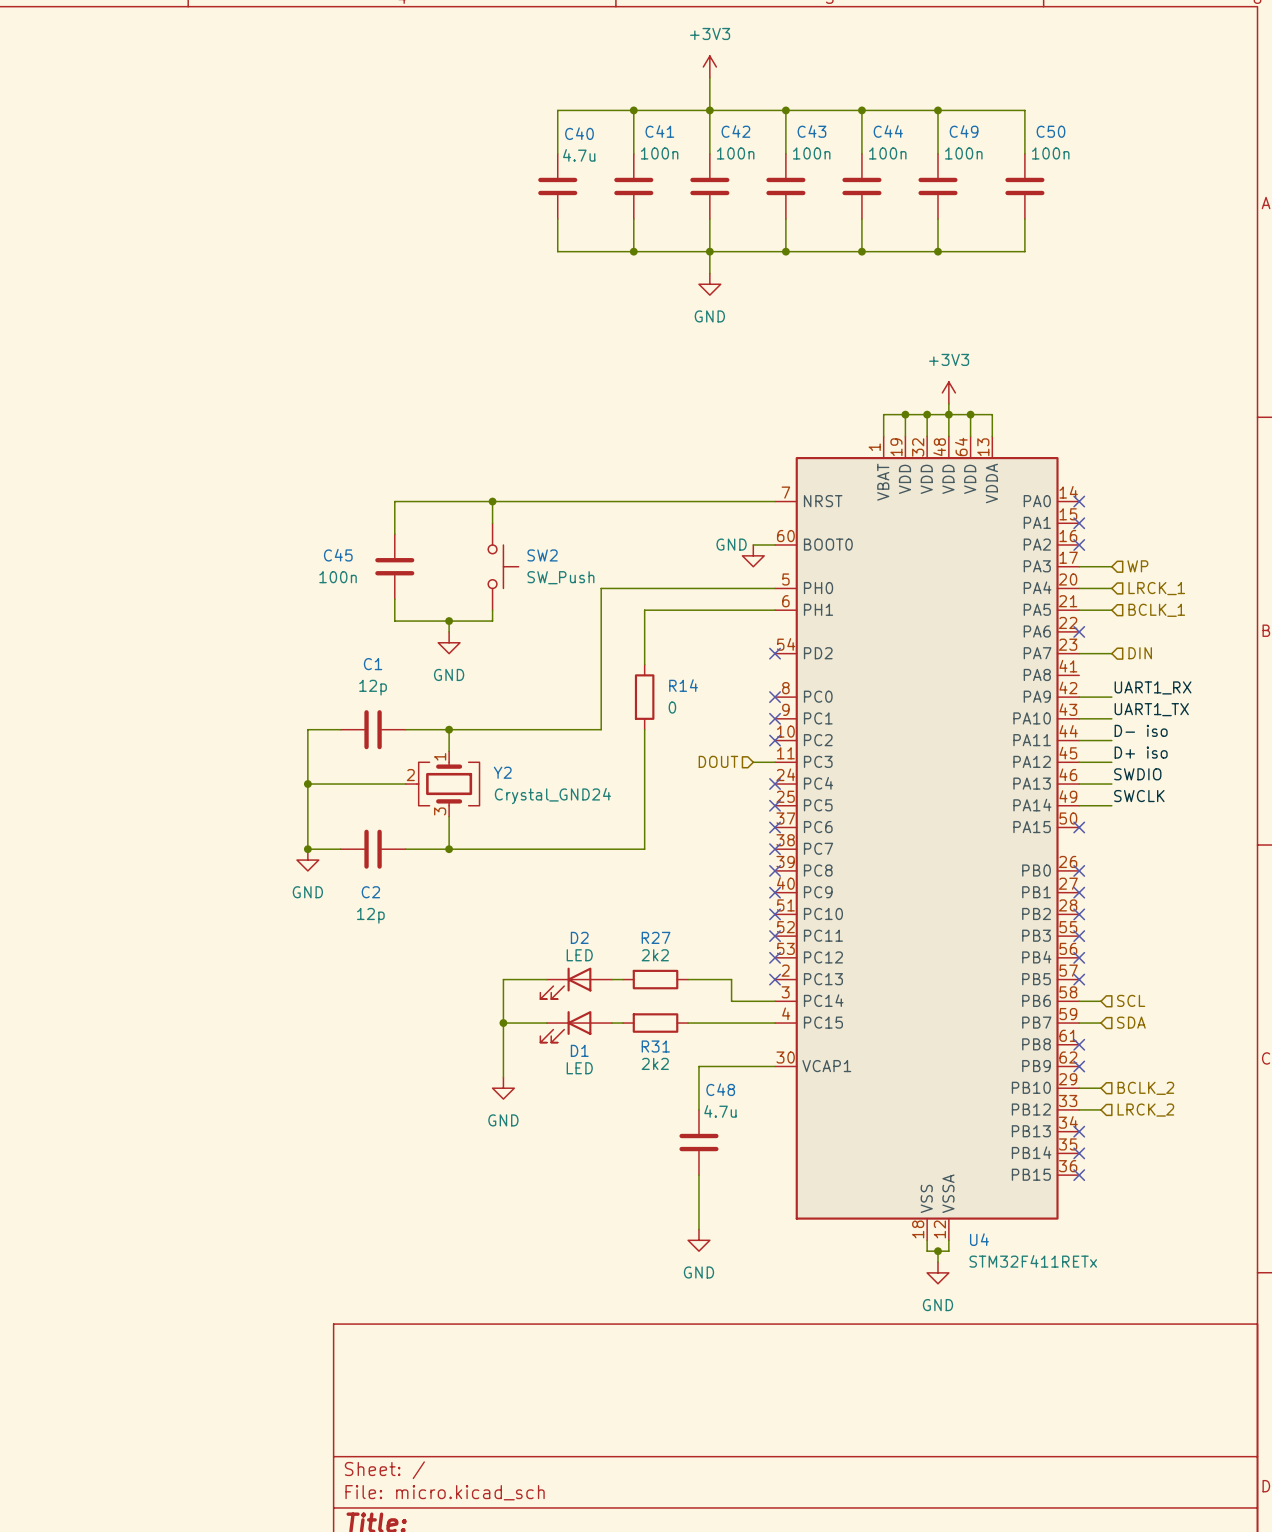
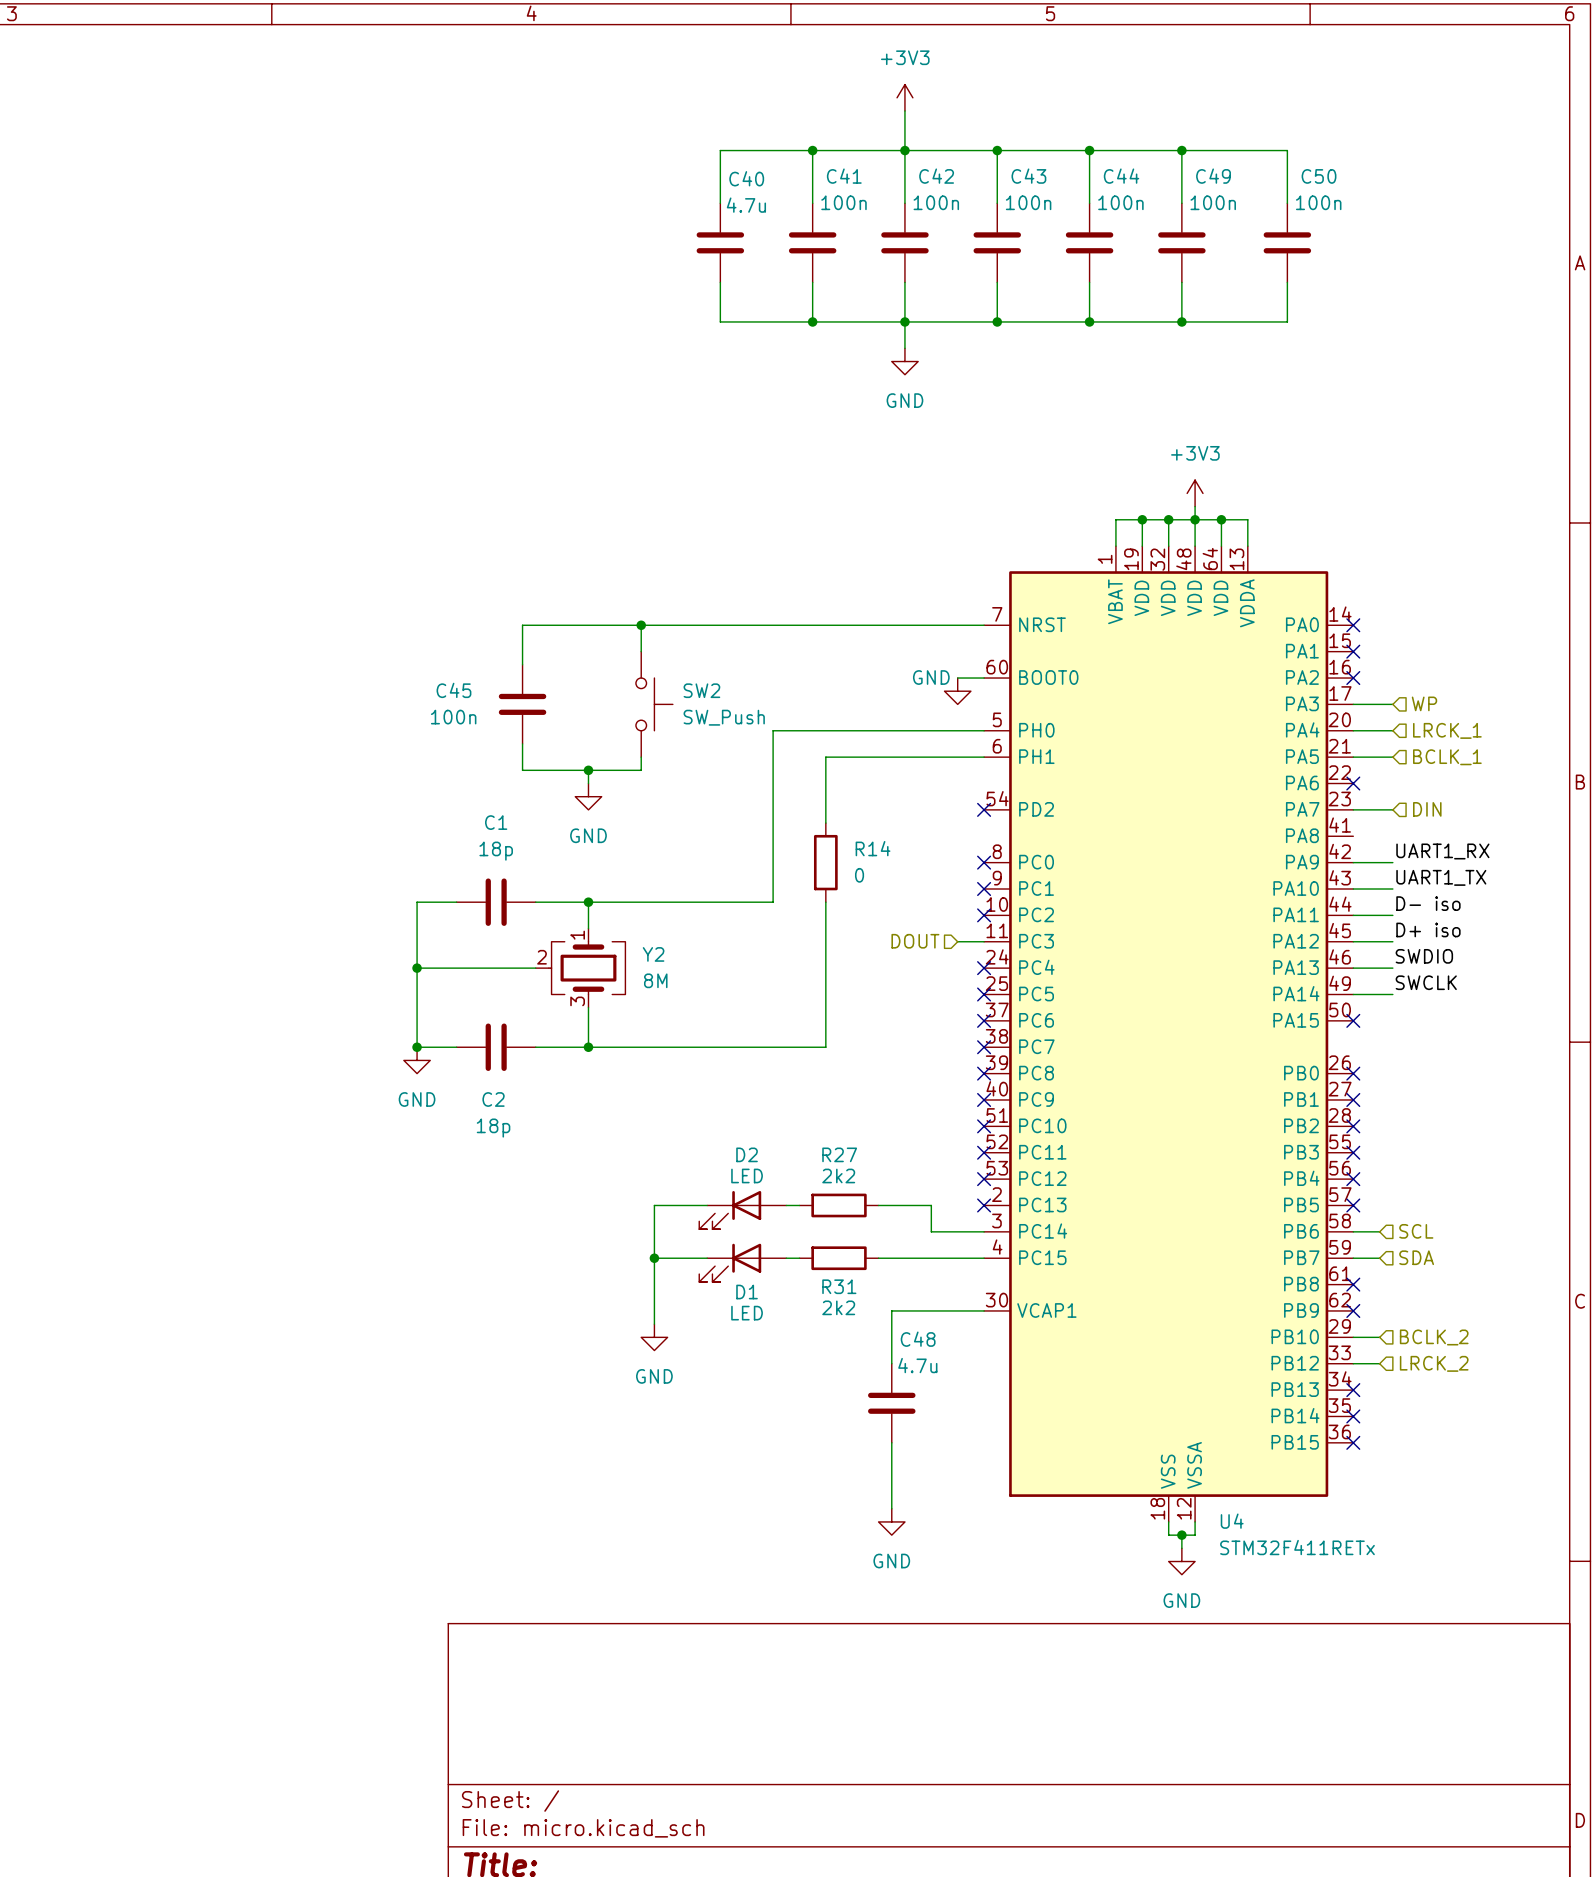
C1 value: 12p (373, 687) -> 18p (496, 851)
Y2 value: Crystal_GND24 (552, 796) -> 8M (655, 980)
C2 value: 12p (370, 915) -> 18p (493, 1128)

